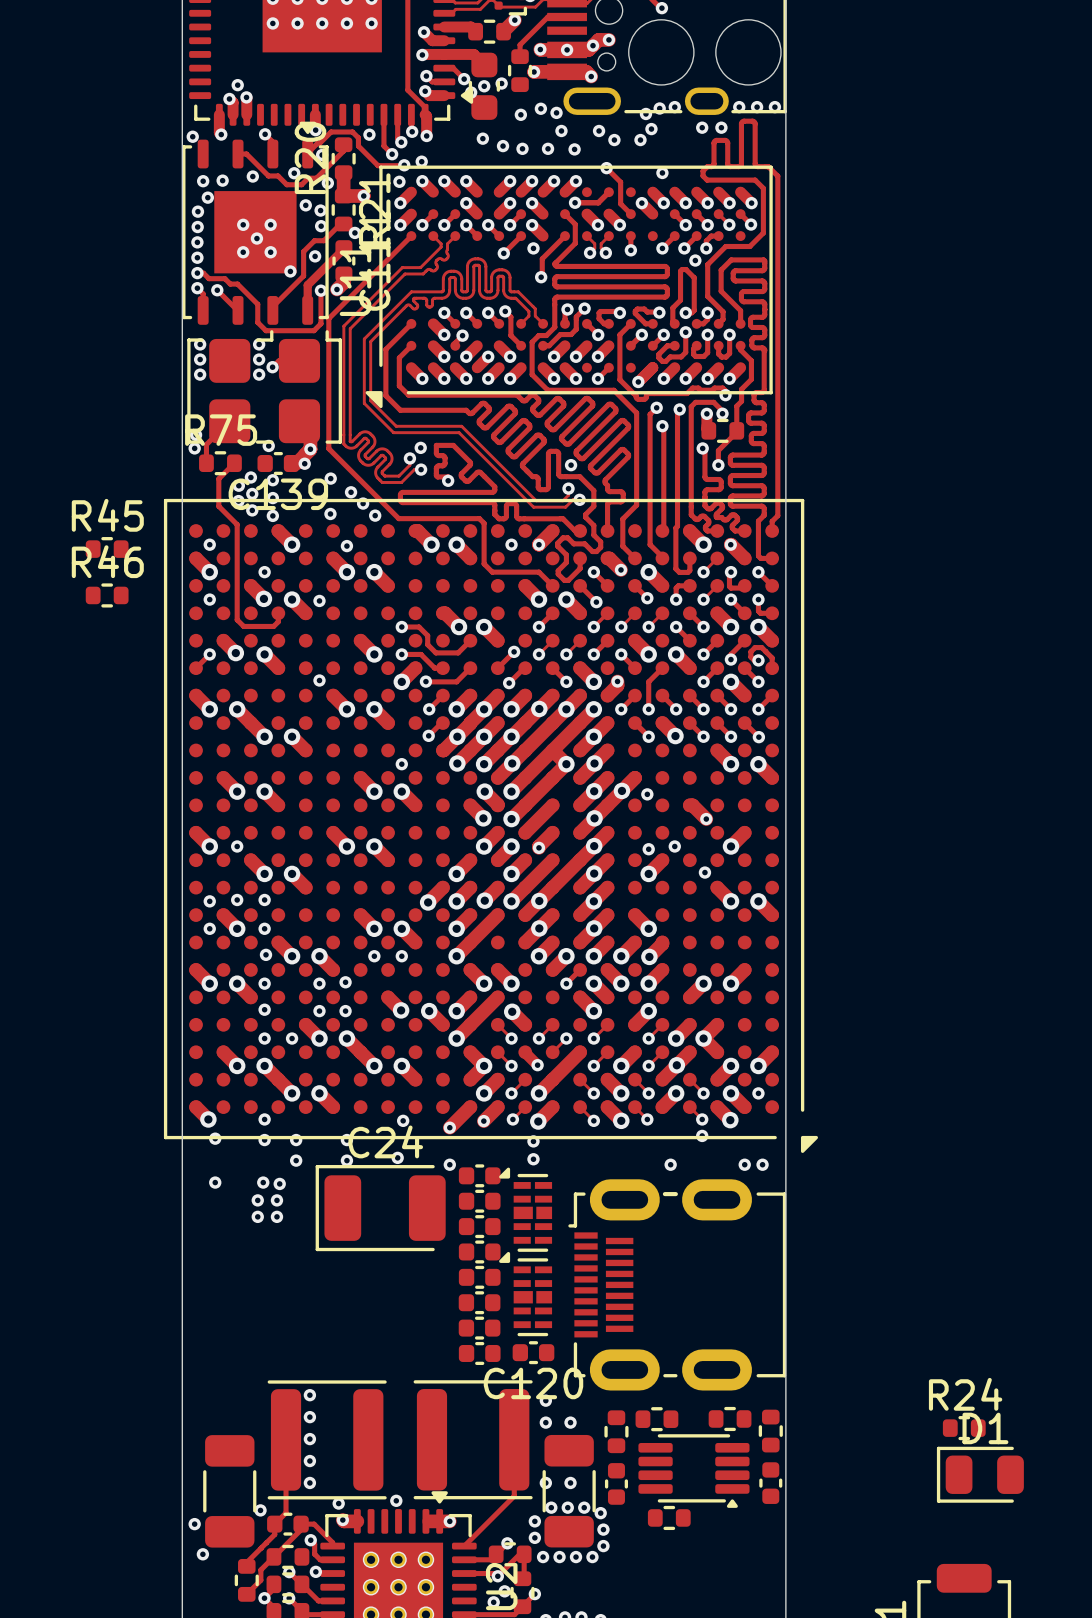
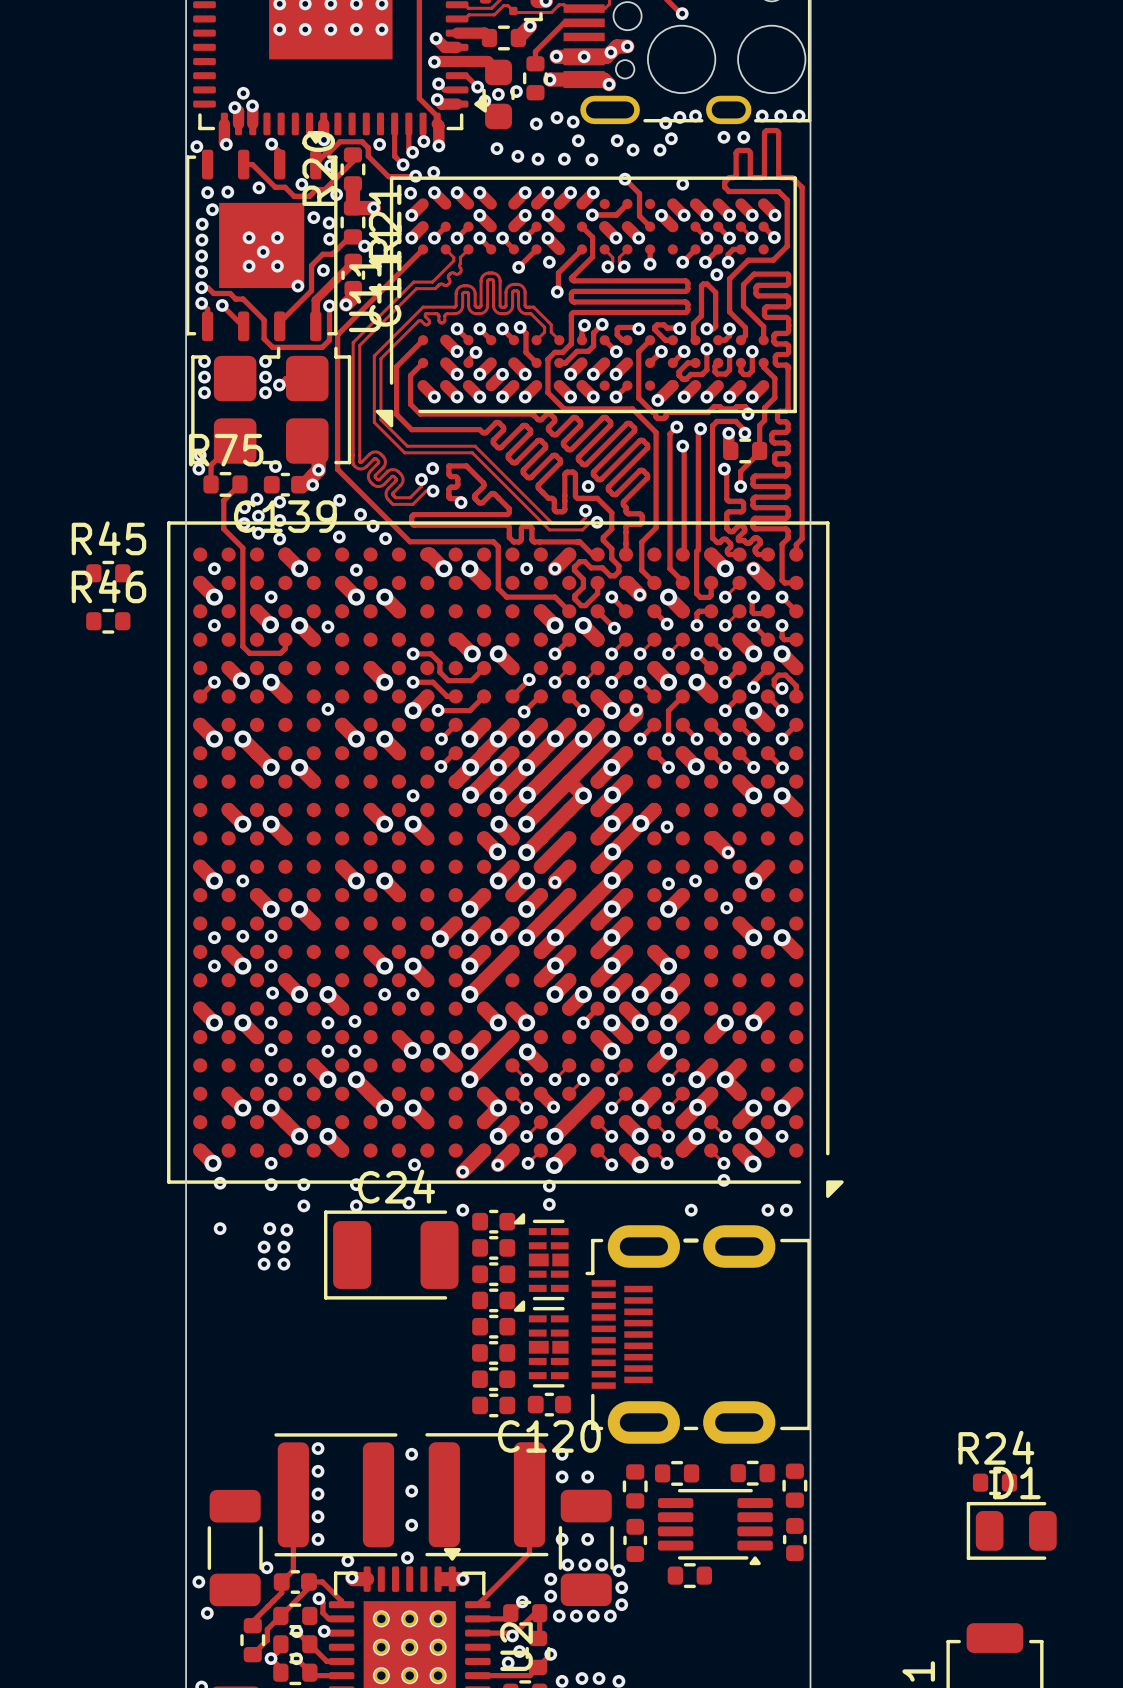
via: none -> (411, 1454)
via: none -> (411, 1491)
via: none -> (411, 1525)

